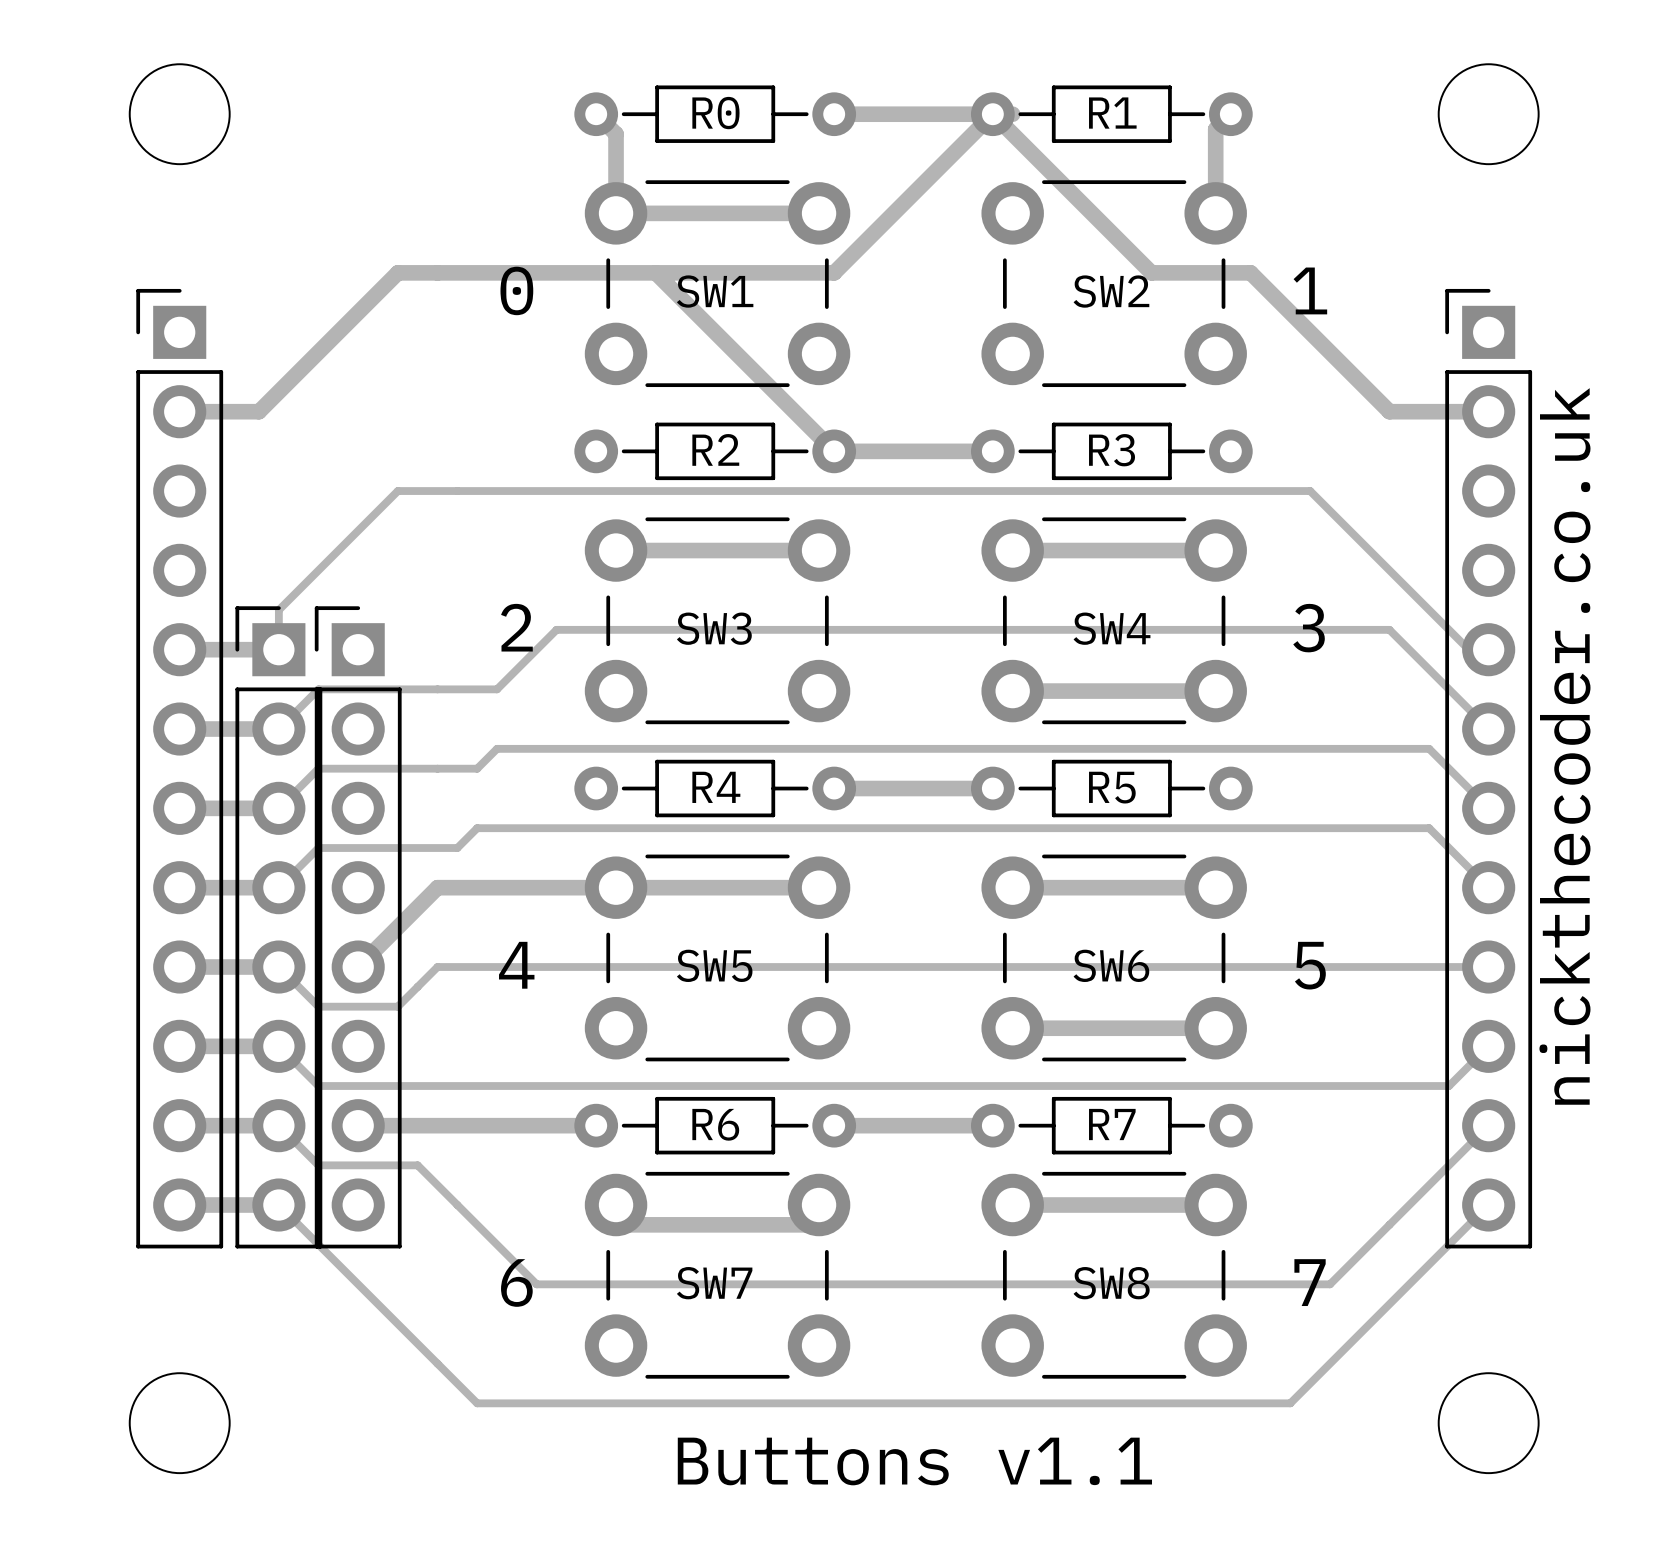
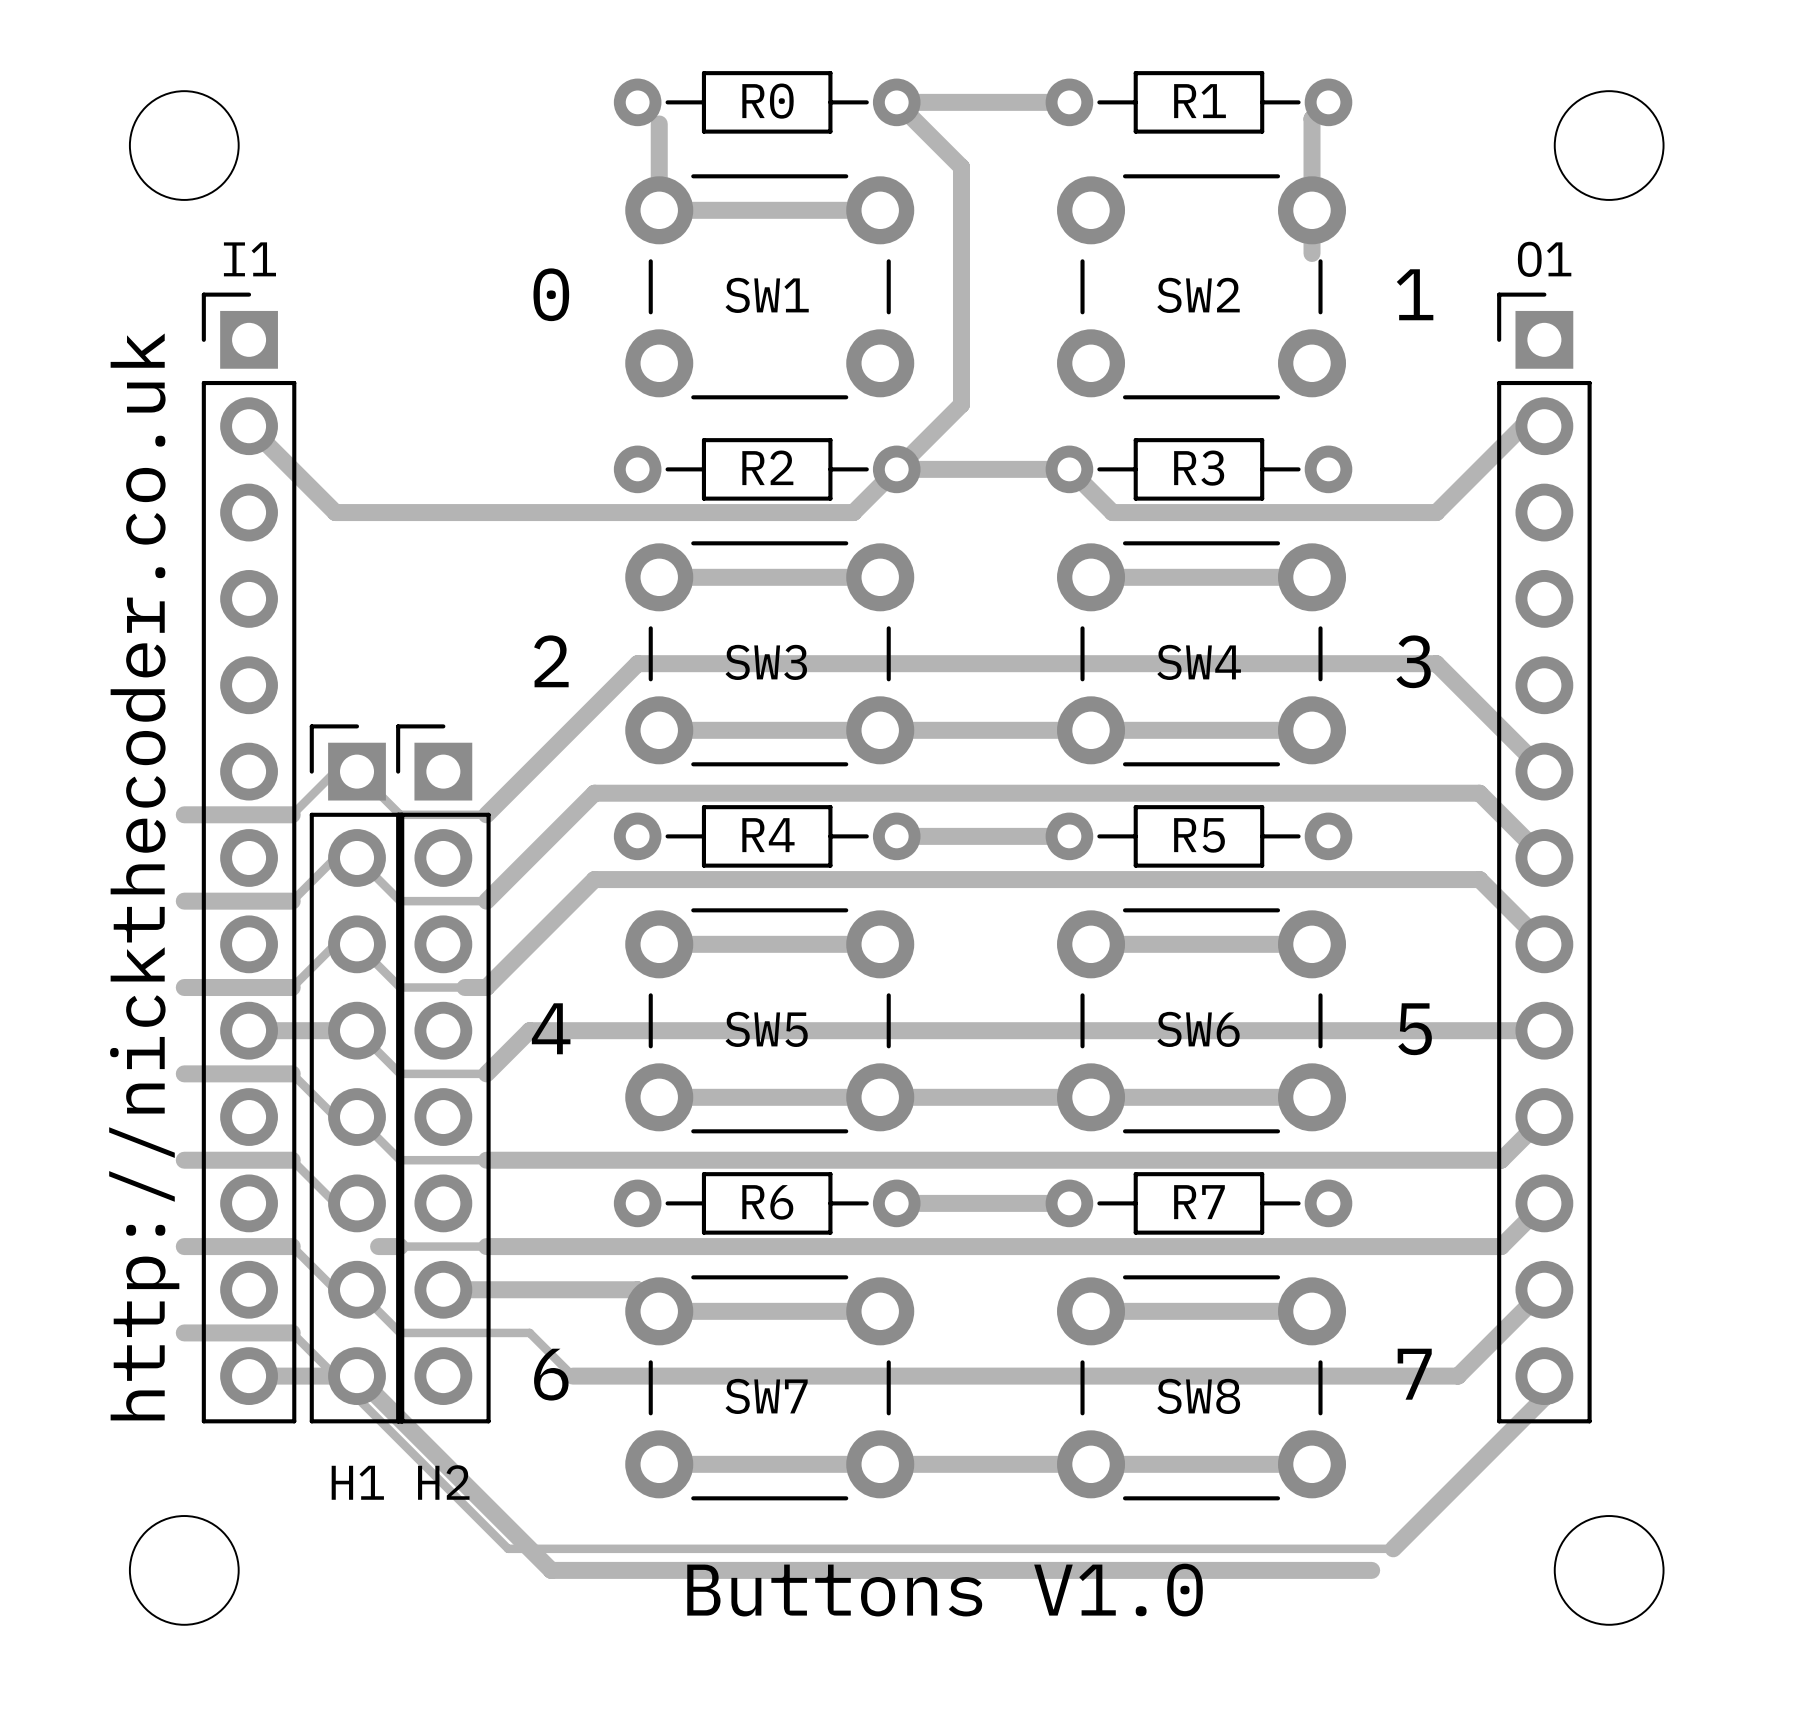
track: none -> (1069, 102) (896, 102) (961, 167) (961, 404) (853, 512)
track: none -> (1312, 118) (1312, 162)
track: none -> (659, 123) (659, 167)
R0 position: (715, 114) -> (767, 102)
track: (834, 114) (1012, 114) -> none
R1 position: (1111, 114) -> (1198, 102)
track: (616, 173) (616, 213) (819, 213) -> (659, 210) (880, 210)
track: (655, 272) (834, 451) (992, 451) -> none
SW1 position: (717, 283) -> (769, 286)
SW2 position: (1114, 283) -> (1201, 286)
text position: 0 (516, 290) -> 0 (551, 294)
text position: 1 (1310, 290) -> 1 (1415, 294)
track: none -> (249, 426) (335, 512) (853, 512)
track: none -> (1522, 426) (1436, 512) (1112, 512) (1069, 469) (896, 469) (853, 512)
track: (179, 411) (259, 411) (397, 272) (834, 272) (992, 114) (1151, 272) (1250, 272) (1389, 411) (1488, 411) -> none
R2 position: (715, 451) -> (767, 469)
R3 position: (1111, 451) -> (1198, 469)
track: (616, 550) (819, 550) -> (659, 577) (880, 577)
track: (1012, 550) (1215, 550) -> (1091, 577) (1312, 577)
SW3 position: (717, 620) -> (769, 653)
SW4 position: (1114, 620) -> (1201, 653)
text position: 2 (516, 627) -> 2 (551, 661)
text position: 3 (1309, 628) -> 3 (1413, 661)
track: (556, 629) (1389, 629) (1488, 729) -> (594, 706) (637, 663) (1436, 663) (1544, 771)
track width: thin (556, 629) (497, 689) -> thick (594, 706) (529, 771)
track: (179, 649) (278, 649) (278, 610) (397, 491) (1310, 491) (1468, 649) (1488, 649) -> none
track: none -> (659, 730) (1312, 730)
track: (338, 689) (497, 689) -> (357, 771) (400, 814) (486, 814) (529, 771)
track: (1012, 691) (1215, 691) -> (659, 944) (880, 944)
text: nickthecoder.co.uk (1564, 746) -> none
track: (834, 748) (497, 748) (477, 768) (338, 768) -> (1544, 857) (1479, 793) (594, 793) (486, 901) (400, 901) (357, 857)
track width: thin (834, 748) (992, 748) -> thick (896, 836) (1069, 836)
track: (992, 748) (1429, 748) (1488, 808) -> none
part: (179, 768) -> none
I1: none -> (249, 857)
O1: none -> (1544, 857)
part: (1488, 768) -> none
text: none -> http://nickthecoder.co.uk (144, 876)
R4 position: (715, 788) -> (767, 836)
track: none -> (1069, 879) (1479, 879) (1544, 944)
R5 position: (1111, 788) -> (1198, 836)
track: (338, 848) (457, 848) (477, 828) (1429, 828) (1488, 887) -> none
track: (437, 887) (358, 967) -> (464, 987) (400, 987) (357, 944)
track: (457, 887) (819, 887) -> (486, 987) (594, 879) (896, 879)
track: (1012, 887) (1215, 887) -> (1091, 944) (1312, 944)
part: (278, 927) -> none
part: (358, 927) -> none
SW5 position: (717, 957) -> (769, 1020)
SW6 position: (1114, 957) -> (1201, 1020)
text position: 4 (516, 965) -> 4 (551, 1028)
text position: 5 (1310, 965) -> 5 (1415, 1029)
H1: none -> (357, 1073)
H2: none -> (443, 1073)
track: (437, 967) (397, 1006) (338, 1006) -> (464, 1073) (400, 1073) (357, 1030) (249, 1030)
track: (457, 967) (1488, 967) -> (486, 1073) (529, 1030) (1544, 1030)
track: none -> (659, 1097) (1312, 1097)
track: none -> (357, 1117) (400, 1160) (1501, 1160) (1544, 1117)
track: (1012, 1028) (1215, 1028) -> (1091, 1311) (1312, 1311)
track: (1488, 1046) (1449, 1086) (992, 1086) -> none
track: (338, 1086) (834, 1086) -> none
track width: thin (834, 1086) (992, 1086) -> thick (896, 1203) (1069, 1203)
track: none -> (1544, 1203) (1501, 1246) (1069, 1246)
track width: thick (378, 1125) (457, 1125) -> thin (400, 1246) (486, 1246)
track: none -> (637, 1246) (896, 1246)
R6 position: (715, 1125) -> (767, 1203)
R7 position: (1111, 1125) -> (1198, 1203)
track: (1488, 1125) (1330, 1284) (536, 1284) (417, 1165) (338, 1165) -> (1544, 1289) (1458, 1376) (572, 1376) (529, 1332) (400, 1332) (357, 1289)
track: none -> (443, 1289) (637, 1289)
track: (1012, 1205) (1215, 1205) -> none
track: (1488, 1205) (1429, 1264) -> none
track: (616, 1224) (819, 1224) -> (659, 1311) (880, 1311)
track: none -> (249, 1376) (357, 1376) (551, 1570)
track width: thin (1429, 1264) (1290, 1403) -> thick (1544, 1397) (1393, 1548)
SW7 position: (717, 1275) -> (769, 1387)
SW8 position: (1114, 1275) -> (1201, 1387)
text position: 6 (516, 1282) -> 6 (551, 1374)
text position: 7 (1310, 1282) -> 7 (1414, 1374)
track: none -> (659, 1464) (1312, 1464)
track: none -> (551, 1570) (1371, 1570) (551, 1570)
text: Buttons v1.1 (914, 1461) -> Buttons V1.0 (945, 1590)

